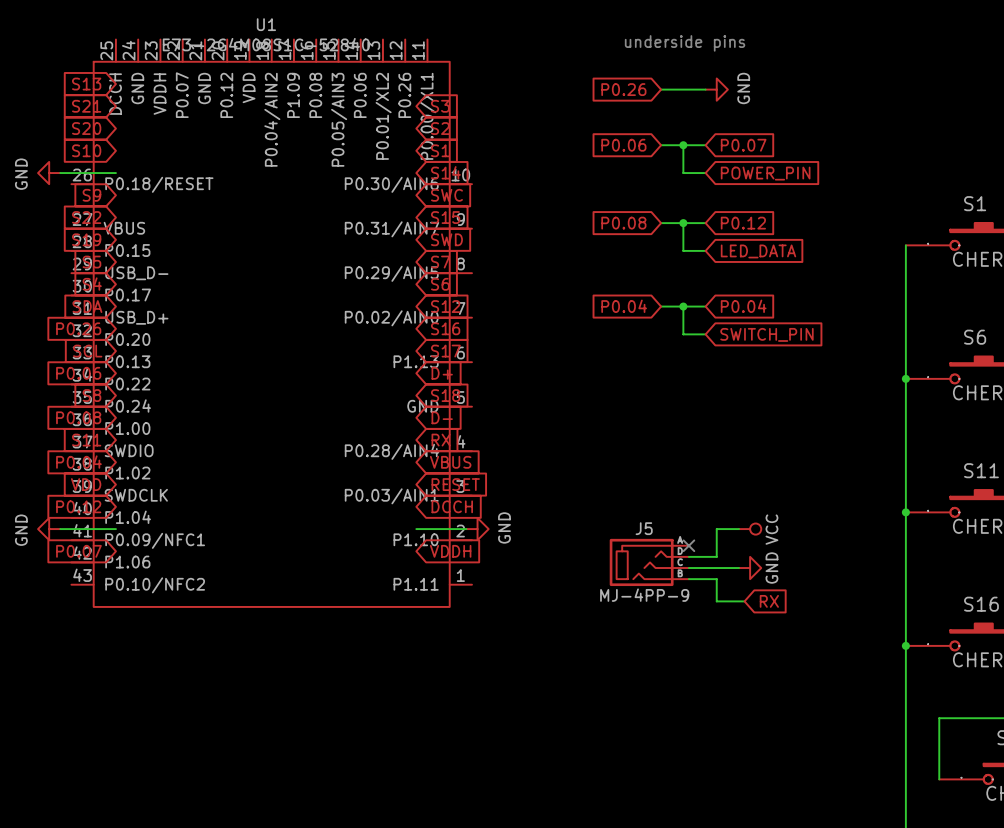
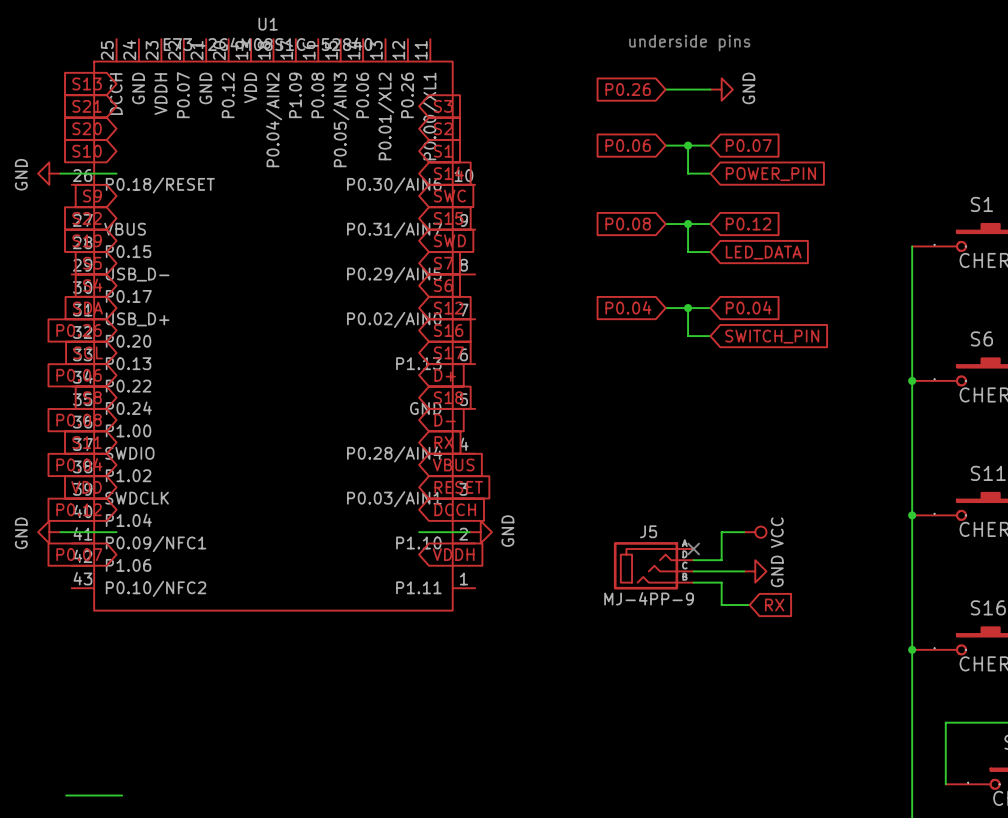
wire: none -> (66, 795) (122, 795)

